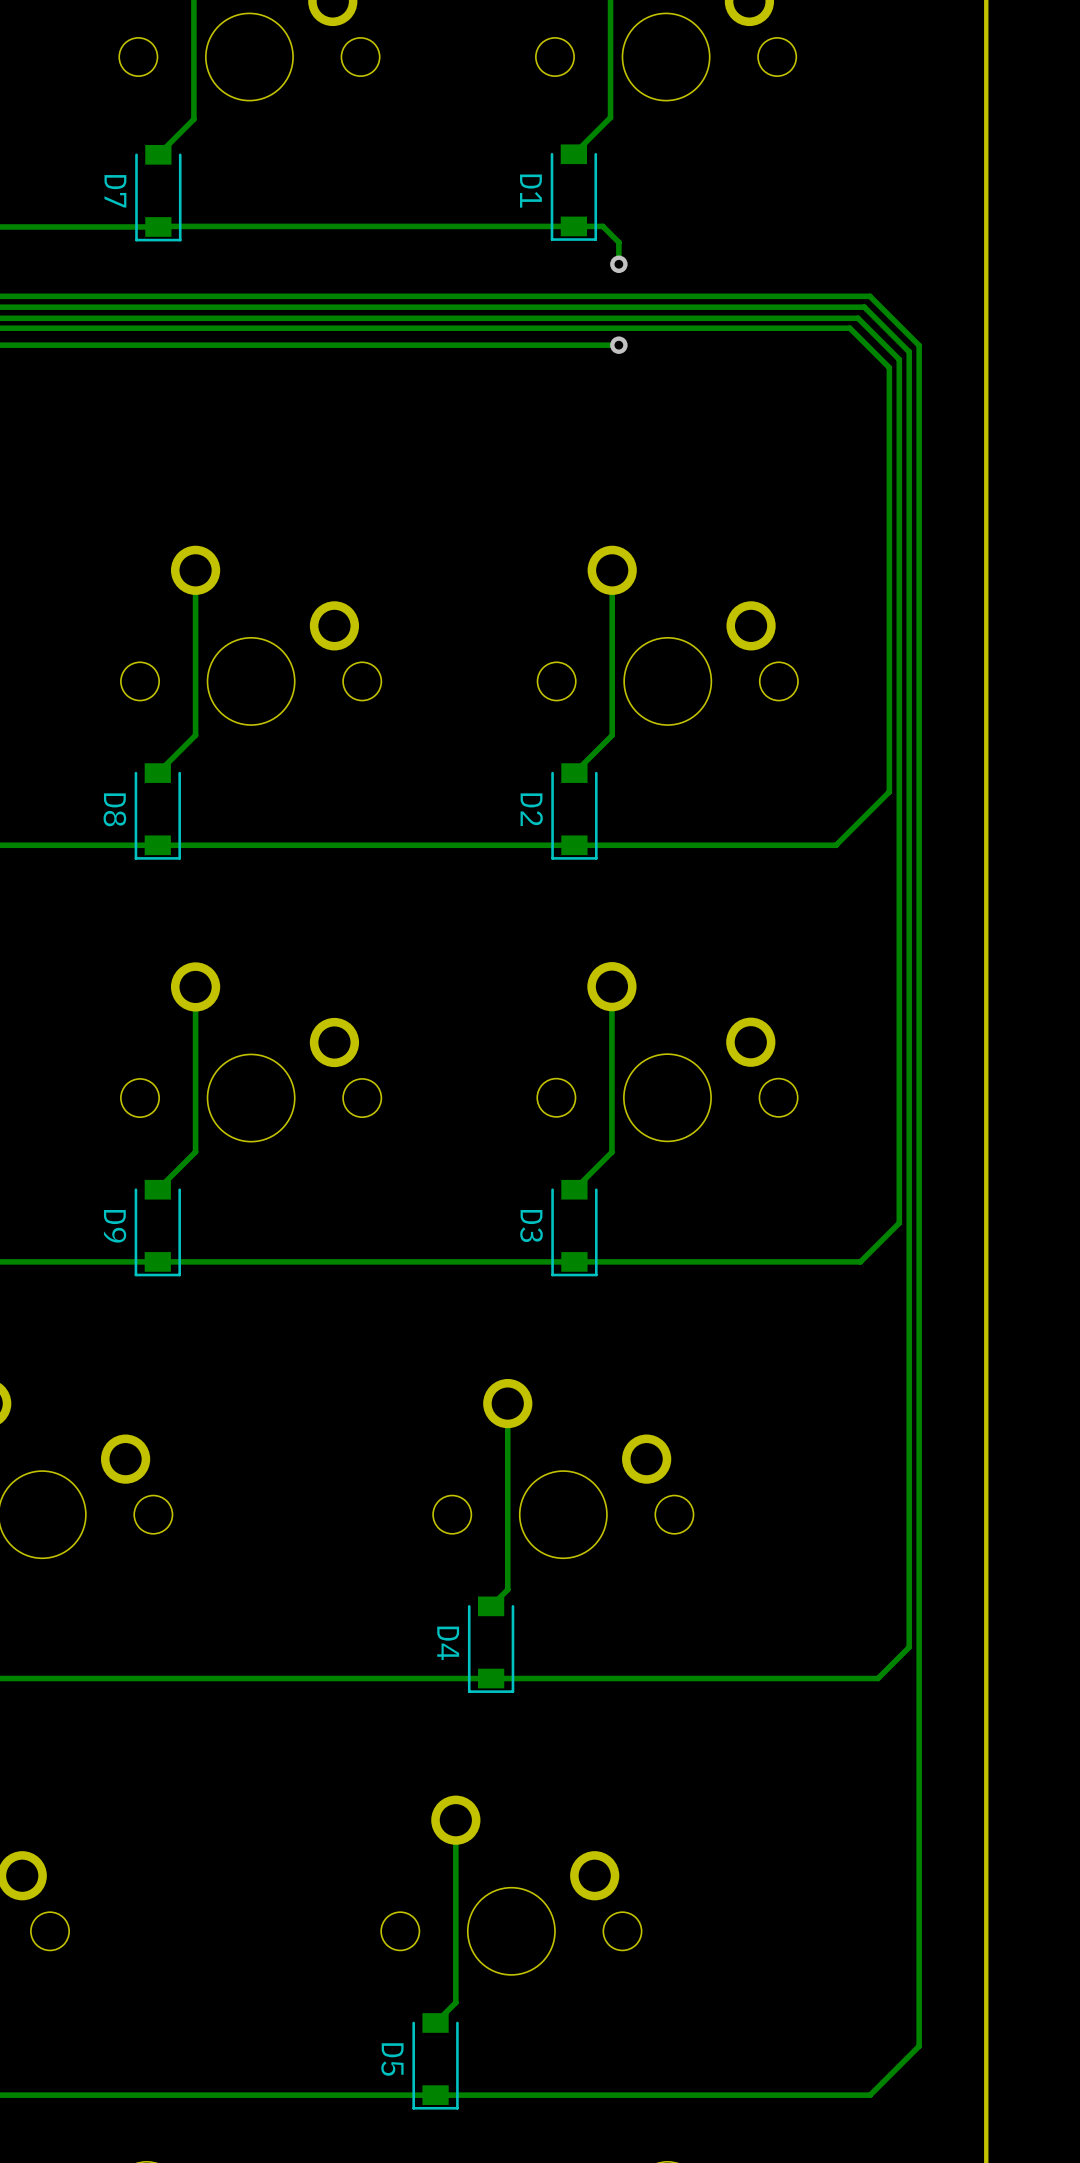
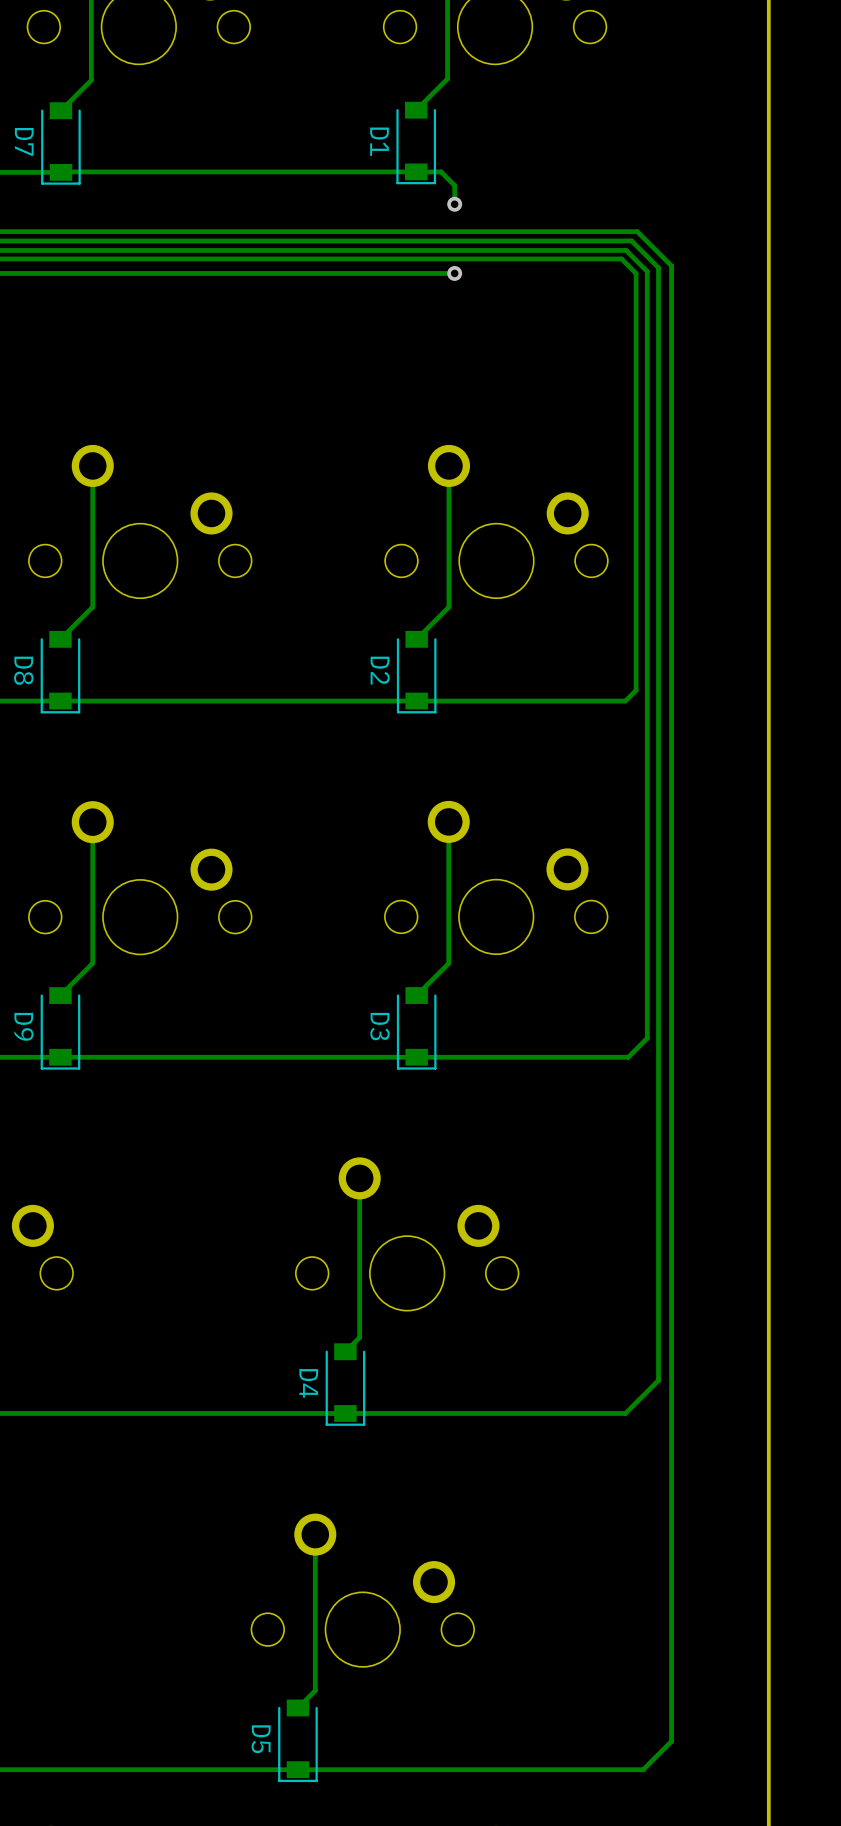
track: (832, 296) (869, 296) (919, 345) (919, 2046) (870, 2095) (839, 2095) -> (637, 231) (671, 265) (671, 1741) (643, 1769)
track: (825, 307) (864, 307) (909, 351) (909, 1647) (877, 1678) (818, 1678) -> (631, 240) (658, 267) (658, 1380) (625, 1413)
track: (819, 318) (858, 318) (899, 359) (899, 1223) (860, 1261) (821, 1261) -> (626, 250) (647, 271) (647, 1038) (628, 1057)
track: (814, 328) (849, 328) (889, 367) (889, 791) (836, 845) (818, 845) -> (621, 258) (636, 273) (636, 690) (625, 701)

